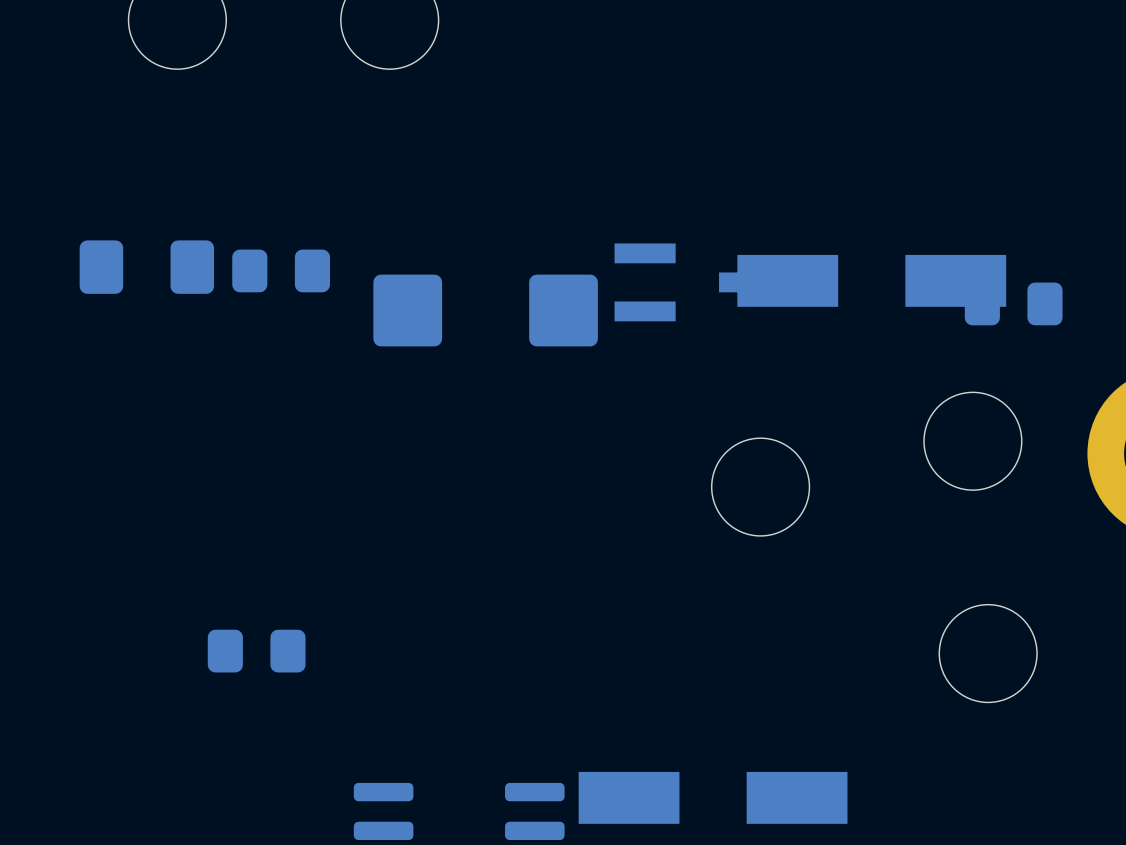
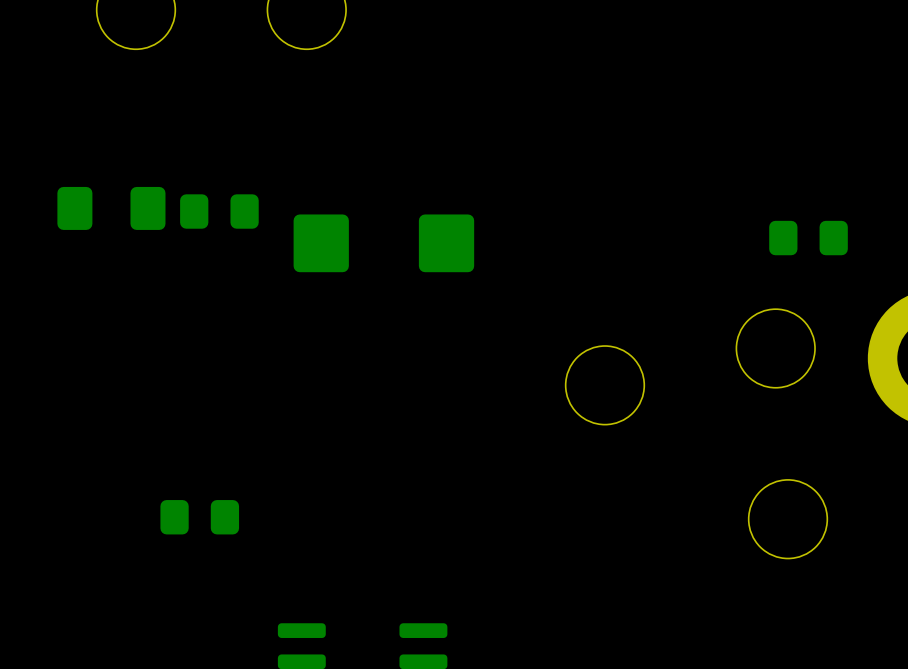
part: (871, 280) -> none
part: (697, 282) -> none
part: (713, 797) -> none

